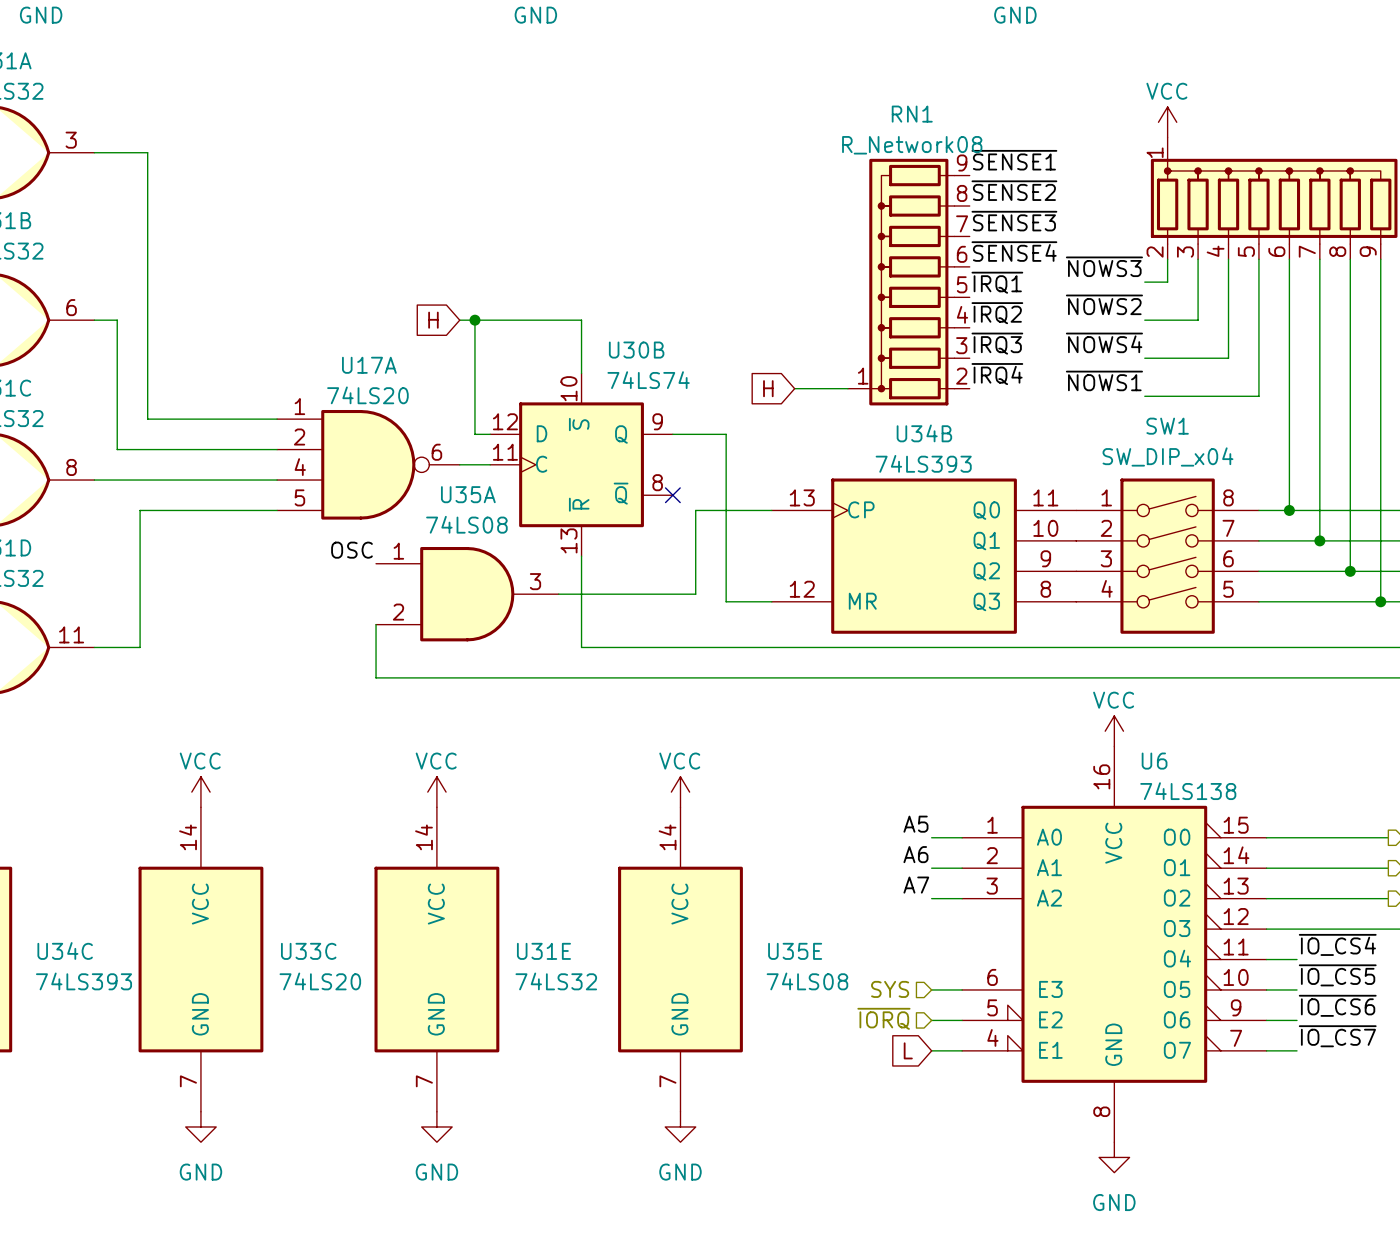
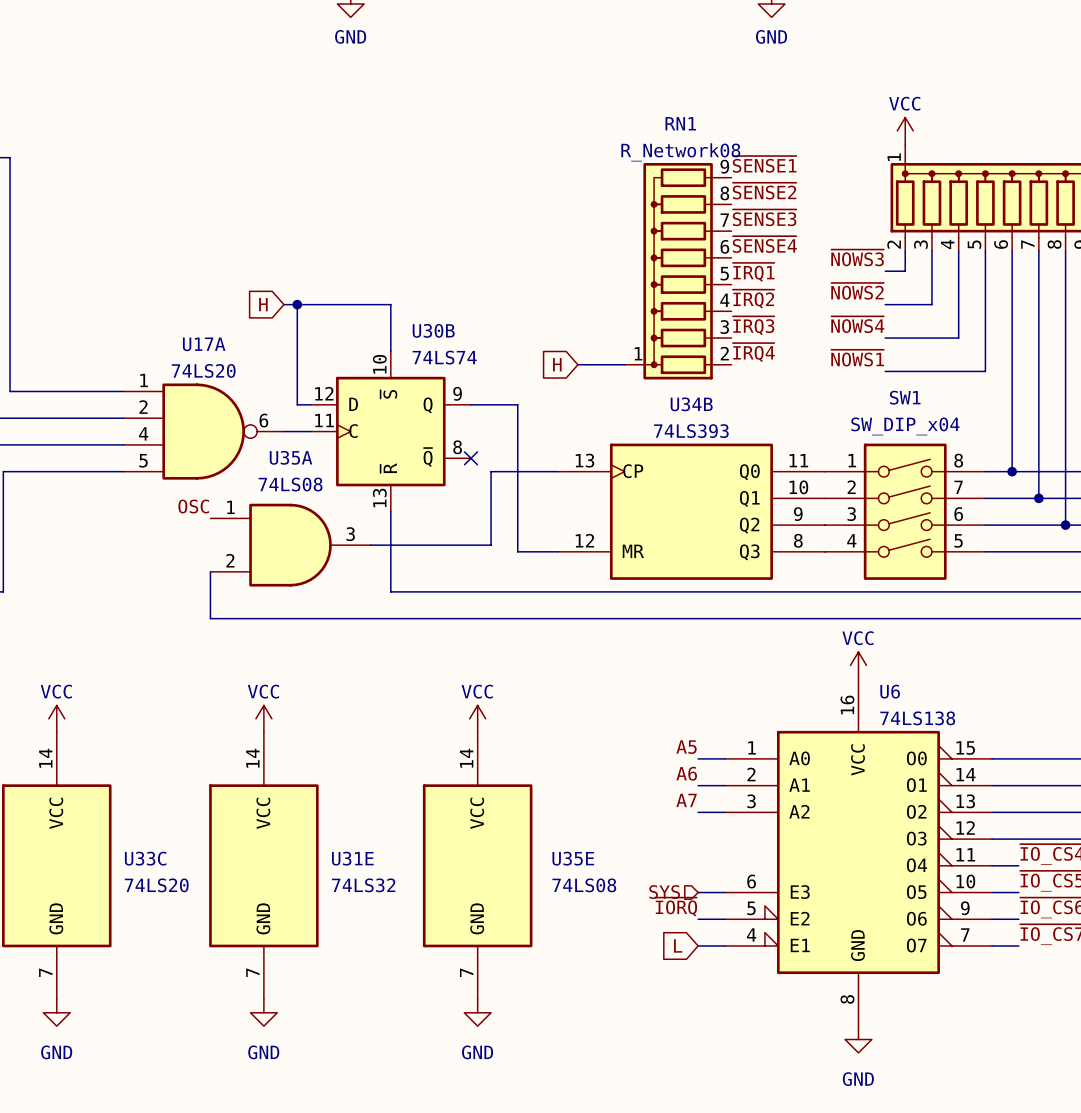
label: none -> ~{IORQ} (676, 907)
hierarchical label: ~{IORQ} (883, 1018) -> none

